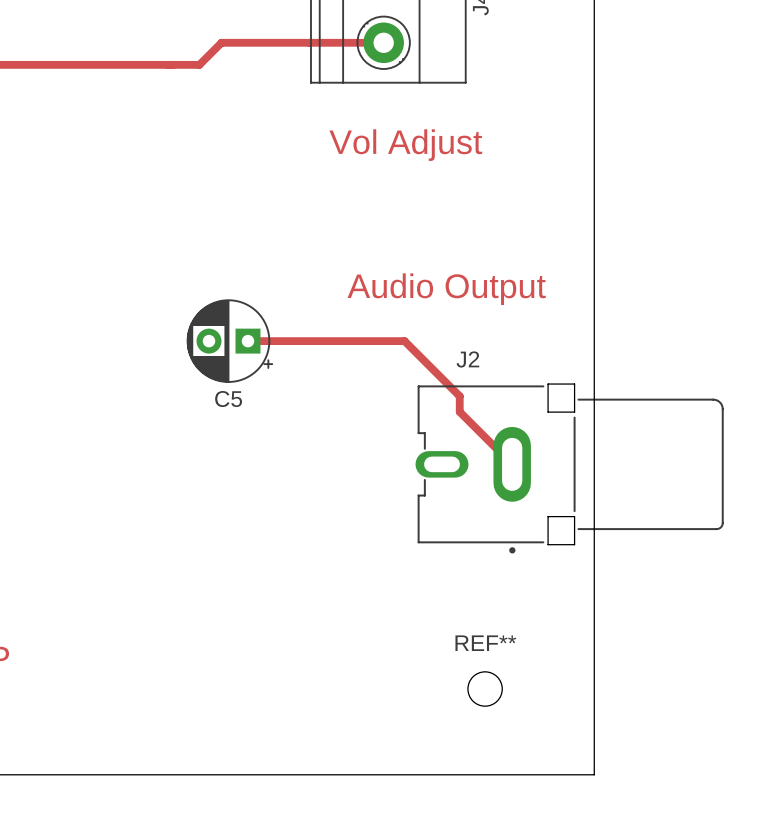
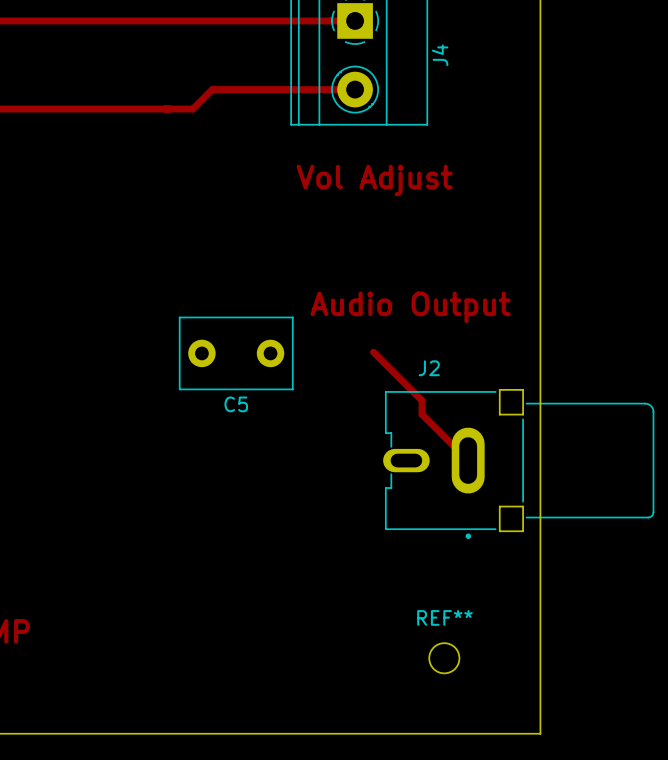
C5 footprint: [186, 299, 274, 383] -> [178, 316, 294, 391]
track: (247, 341) (404, 341) -> none

